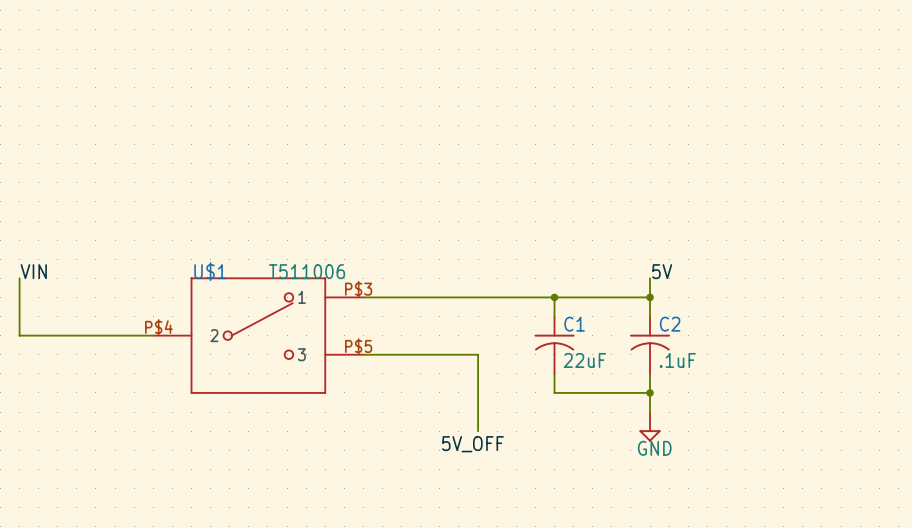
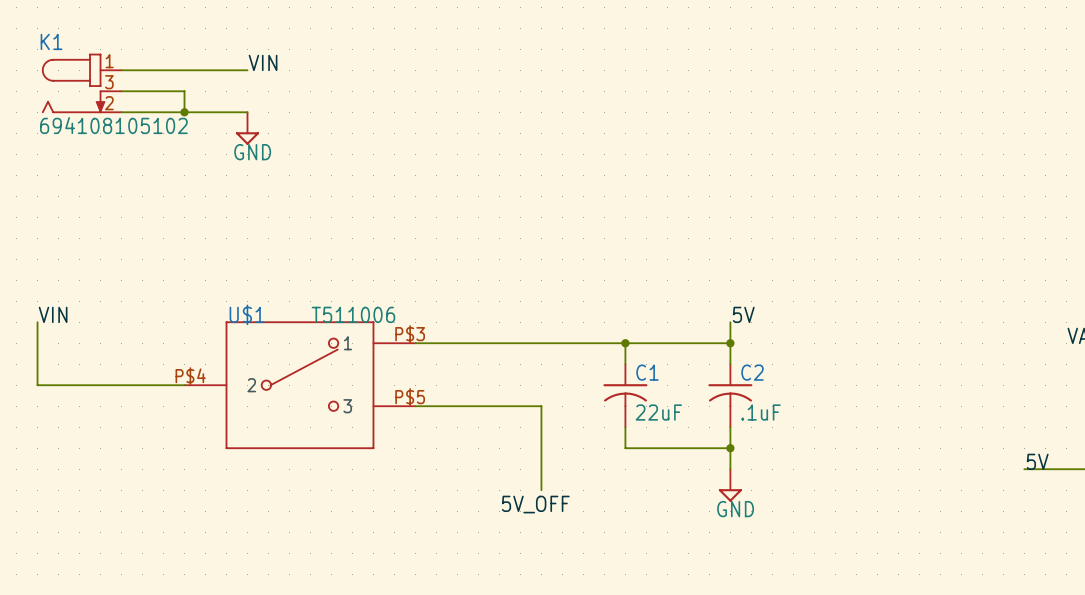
label: none -> VIN (263, 62)
wire: none -> (121, 70) (247, 70)
K1: none -> 694108105102 (81, 83)
wire: none -> (121, 91) (184, 91) (184, 112)
wire: none -> (121, 112) (247, 112)
junction: none -> (184, 112)
power symbol: none -> GND (247, 128)

